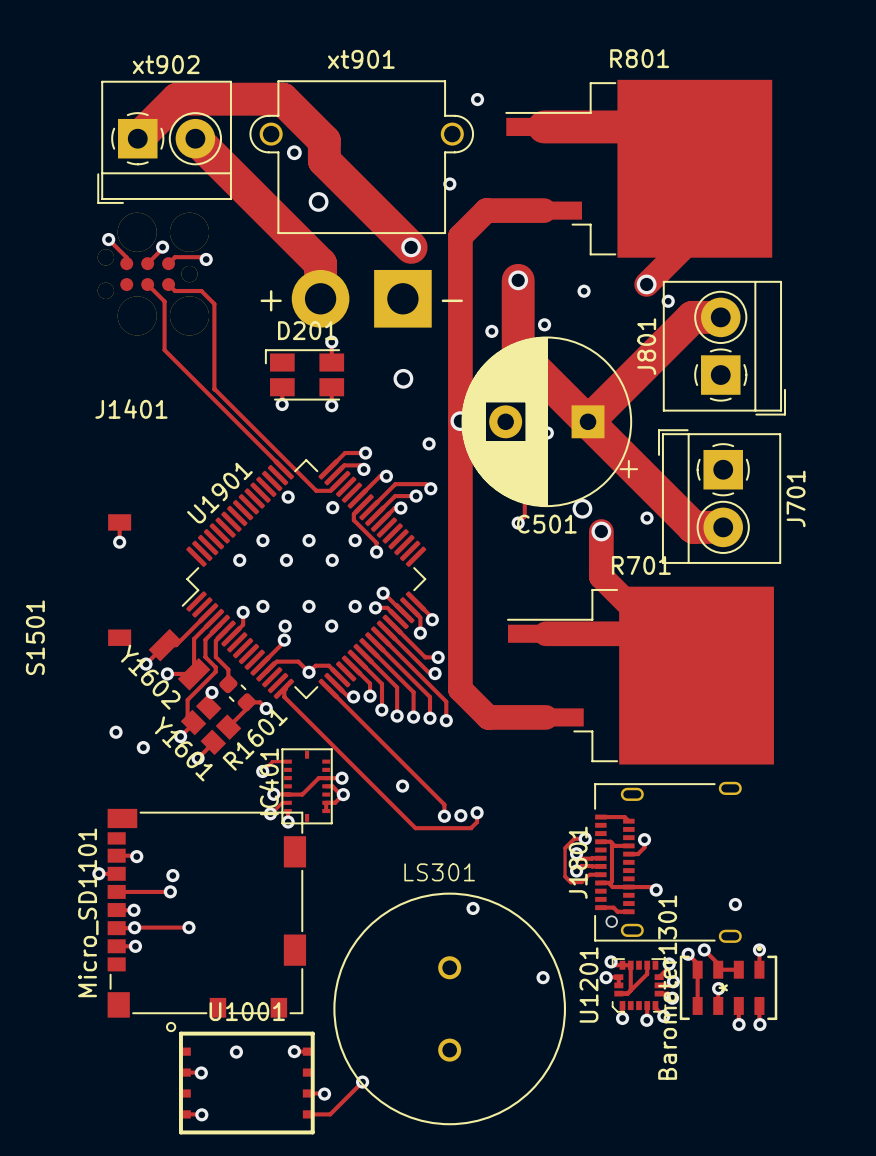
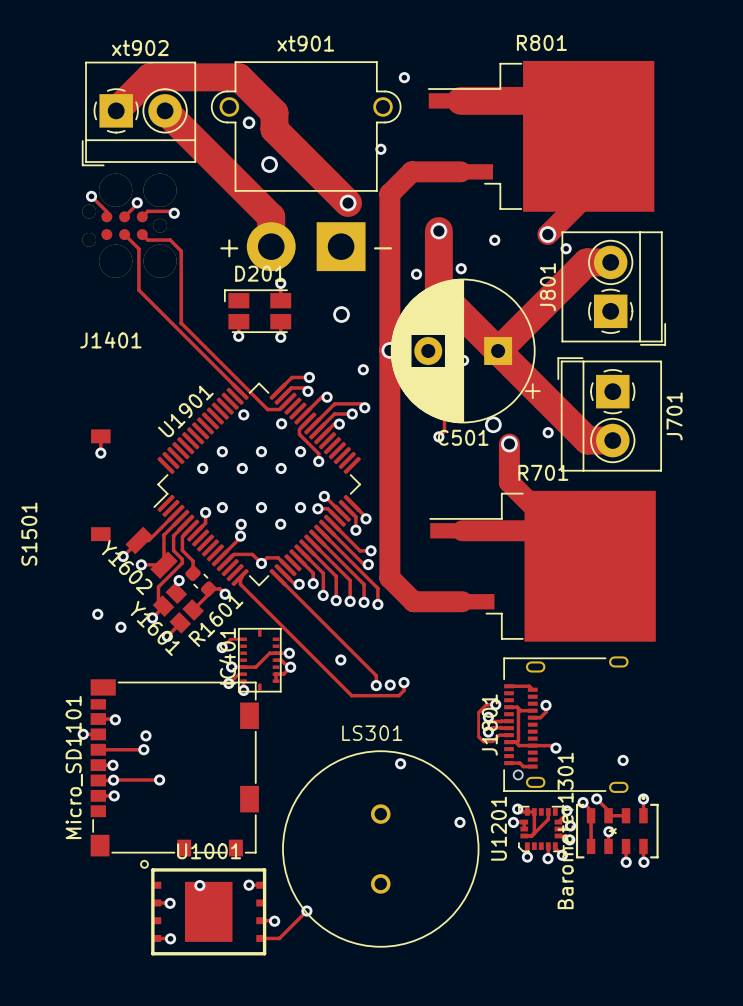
U1001 footprint: [165, 1021, 315, 1135] -> [140, 860, 267, 956]

